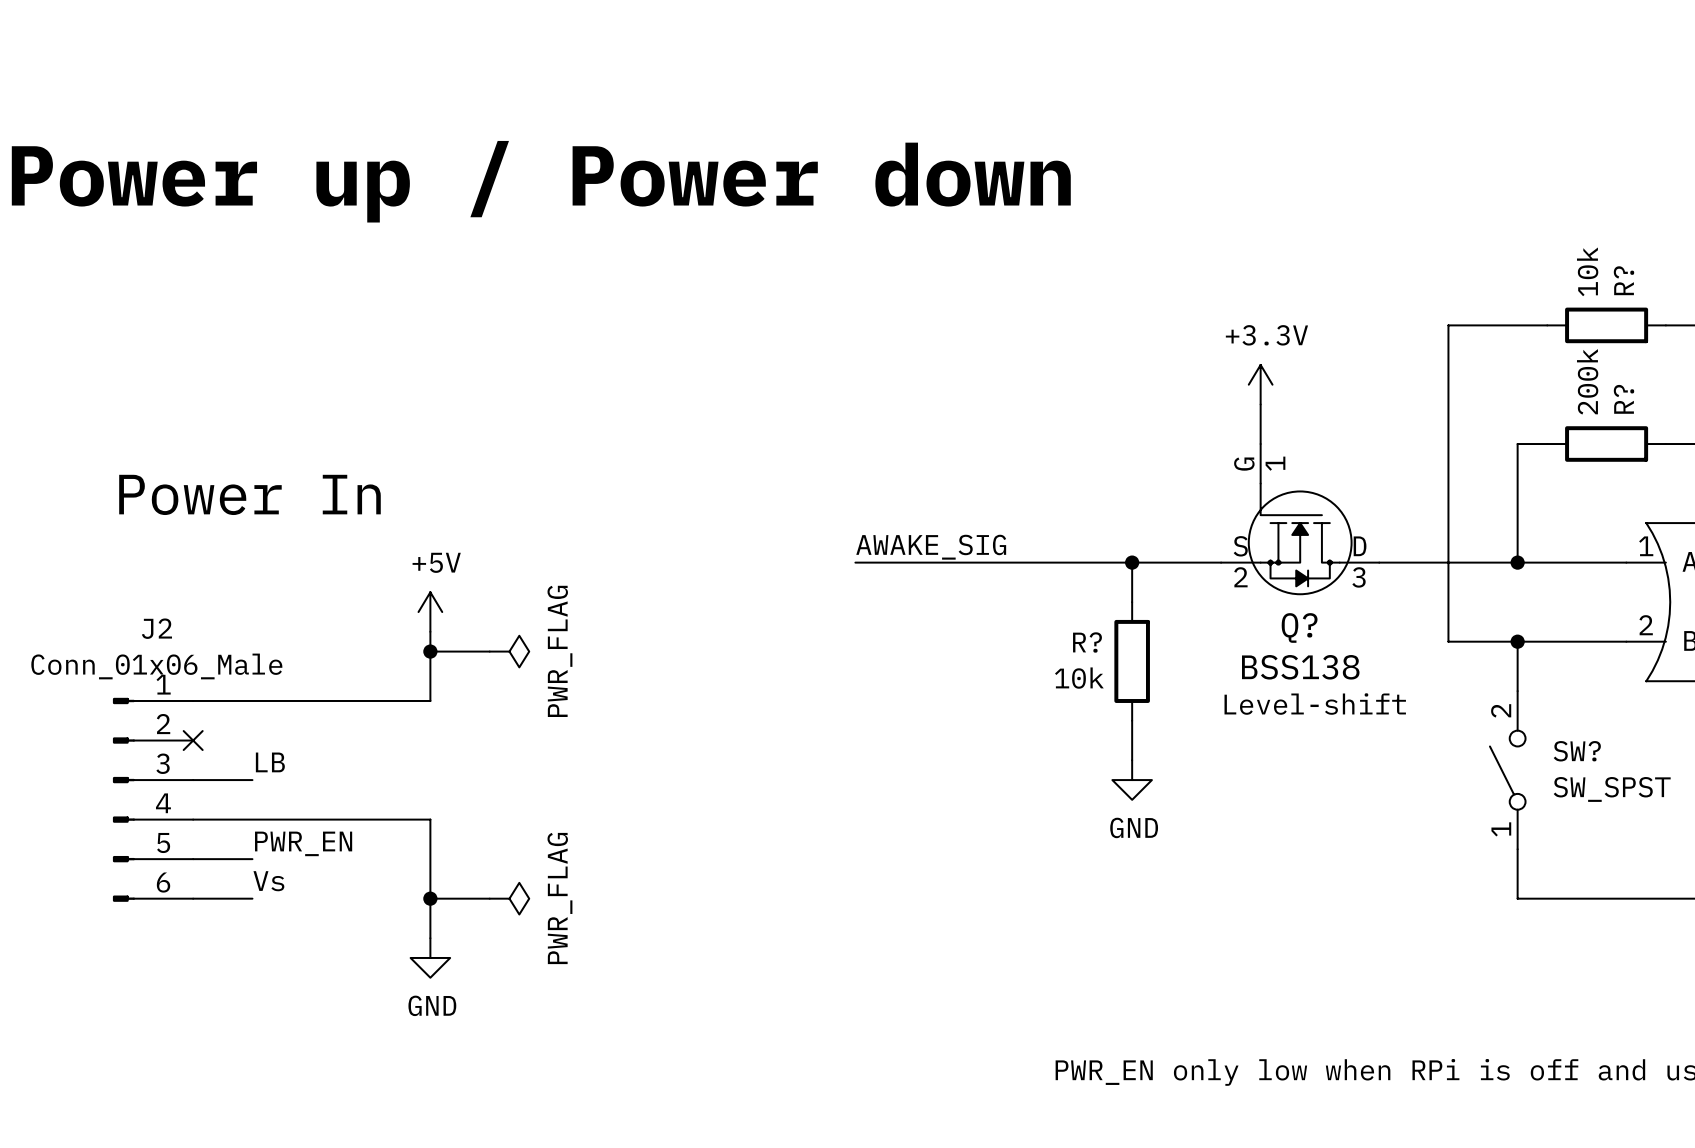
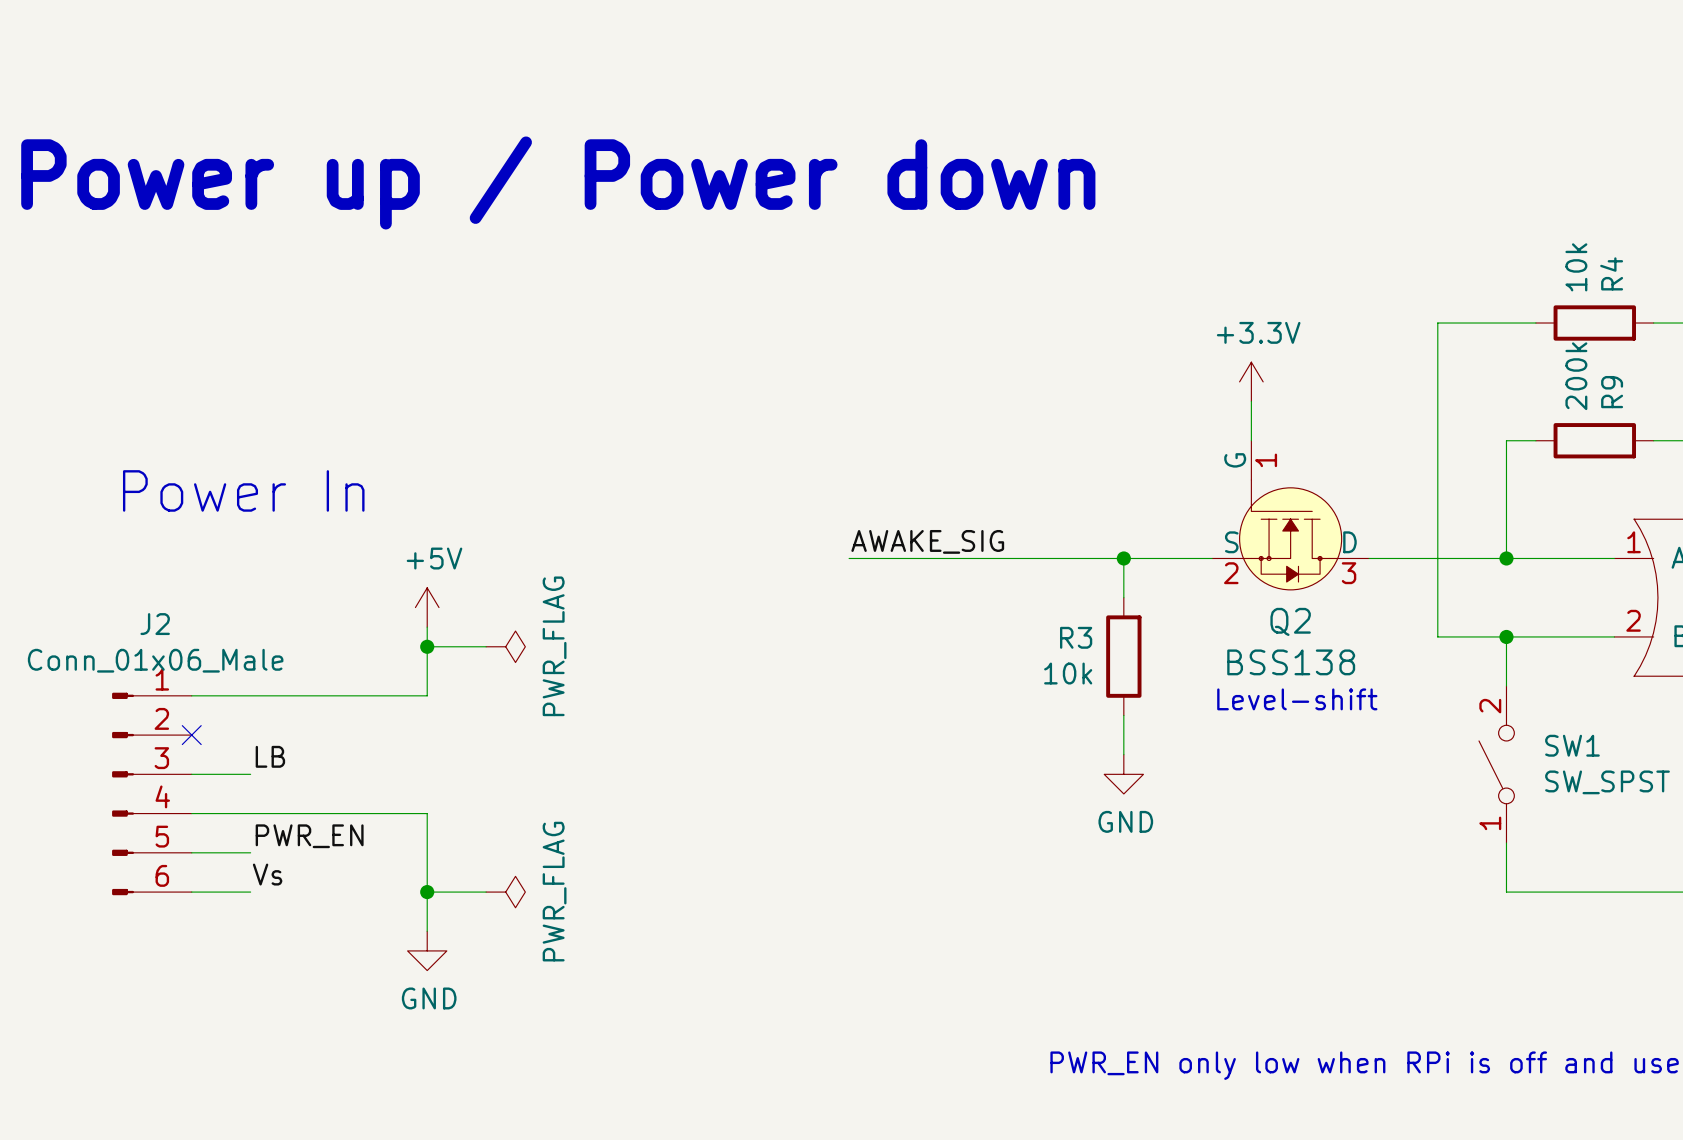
R? name: R? (1624, 280) -> R4 (1611, 273)
R? name: R? (1624, 399) -> R9 (1612, 392)
Q? name: Q? (1299, 627) -> Q2 (1290, 621)
R? name: R? (1087, 642) -> R3 (1076, 637)
SW? name: SW? (1577, 751) -> SW1 (1572, 745)

